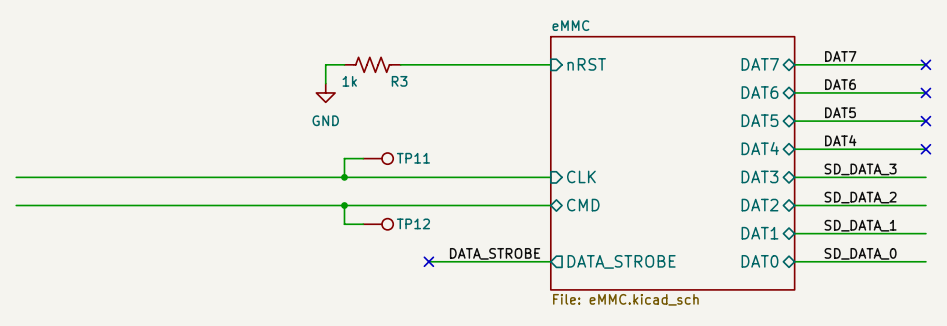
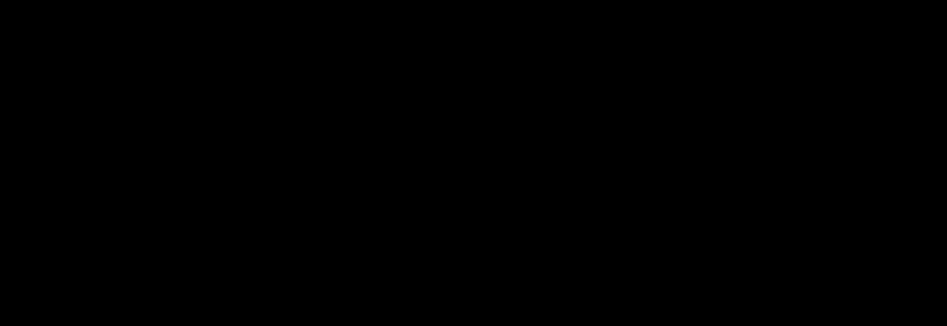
label: DAT7 (840, 56) -> none
wire: (344, 64) (325, 64) (325, 83) -> none
R3: 1k (372, 64) -> none
wire: (400, 64) (550, 64) -> none
sheet pin: nRST (586, 64) -> none
sheet pin: DAT7 (760, 64) -> none
wire: (794, 64) (925, 64) -> none
no-connect mark: (925, 64) -> none
label: DAT6 (840, 84) -> none
power symbol: GND (325, 92) -> none
sheet pin: DAT6 (760, 92) -> none
wire: (794, 92) (925, 92) -> none
no-connect mark: (925, 92) -> none
label: DAT5 (840, 112) -> none
sheet pin: DAT5 (760, 120) -> none
wire: (794, 121) (925, 121) -> none
no-connect mark: (925, 121) -> none
label: DAT4 (840, 140) -> none
sheet pin: DAT4 (760, 148) -> none
wire: (794, 149) (925, 149) -> none
no-connect mark: (925, 149) -> none
wire: (363, 158) (344, 158) (344, 177) -> none
TP11: (378, 158) -> none
sheet eMMC: File: eMMC.kicad_sch (672, 163) -> none
label: SD_DATA_3 (860, 169) -> none
sheet pin: CLK (581, 176) -> none
sheet pin: DAT3 (760, 176) -> none
wire: (16, 177) (550, 177) -> none
junction: (344, 177) -> none
wire: (794, 177) (925, 177) -> none
label: SD_DATA_2 (860, 197) -> none
wire: (16, 205) (550, 205) -> none
wire: (344, 205) (344, 224) (363, 224) -> none
junction: (344, 205) -> none
sheet pin: CMD (583, 205) -> none
sheet pin: DAT2 (760, 205) -> none
wire: (794, 205) (925, 205) -> none
TP12: (378, 224) -> none
label: SD_DATA_1 (860, 225) -> none
sheet pin: DAT1 (760, 233) -> none
wire: (794, 233) (925, 233) -> none
label: DATA_STROBE (495, 253) -> none
label: SD_DATA_0 (860, 253) -> none
wire: (428, 261) (550, 261) -> none
no-connect mark: (428, 261) -> none
sheet pin: DATA_STROBE (621, 261) -> none
sheet pin: DAT0 (760, 261) -> none
wire: (794, 261) (925, 261) -> none

